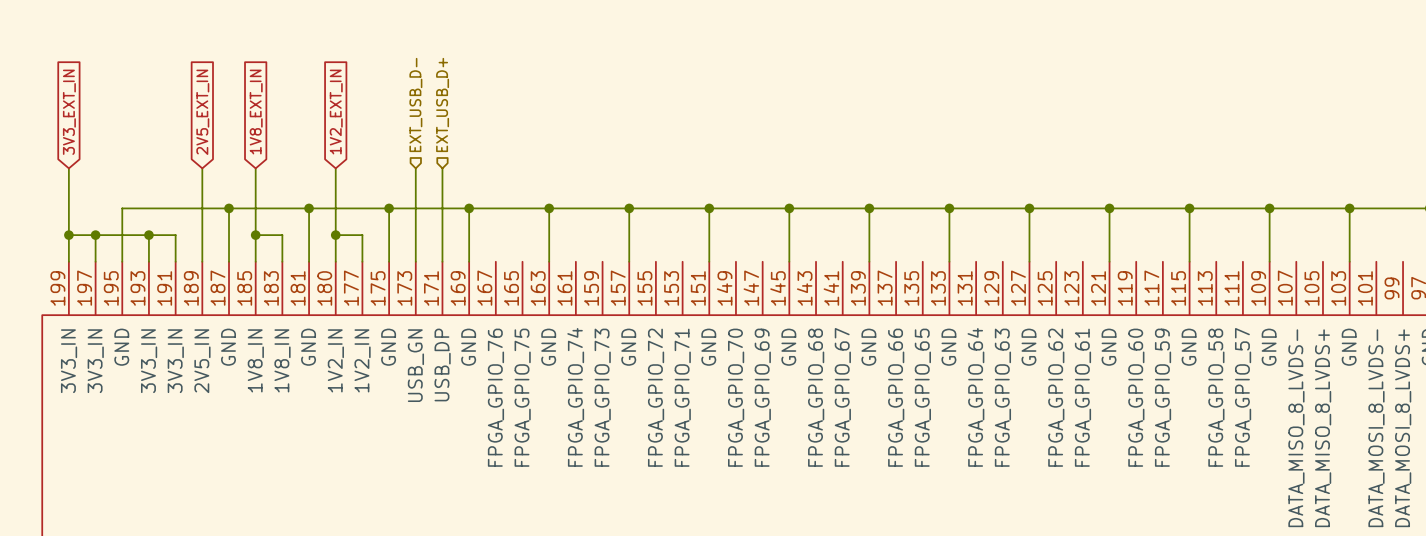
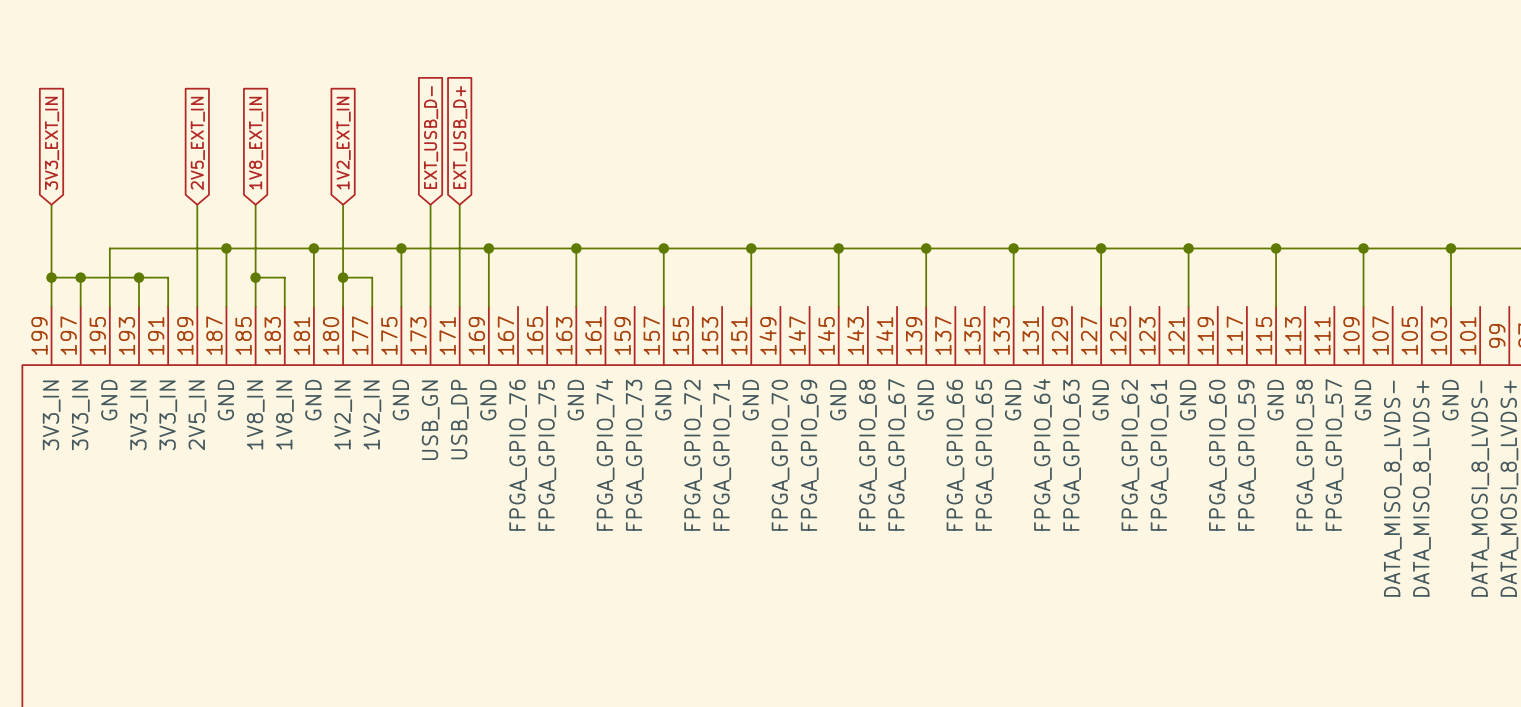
hierarchical label: EXT_USB_D- (415, 104) -> none
hierarchical label: EXT_USB_D+ (442, 104) -> none
global label: none -> EXT_USB_D- (431, 137)
global label: none -> EXT_USB_D+ (460, 137)

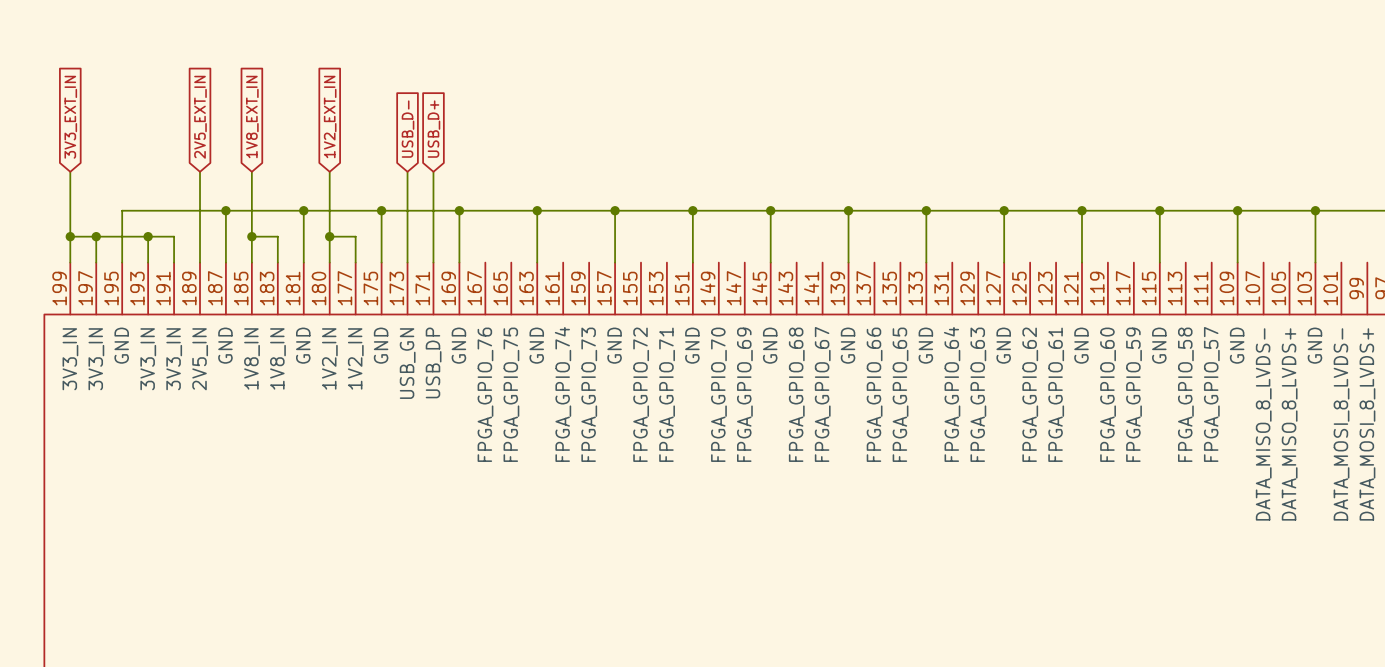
global label: EXT_USB_D- (431, 137) -> USB_D- (408, 129)
global label: EXT_USB_D+ (460, 137) -> USB_D+ (433, 129)

